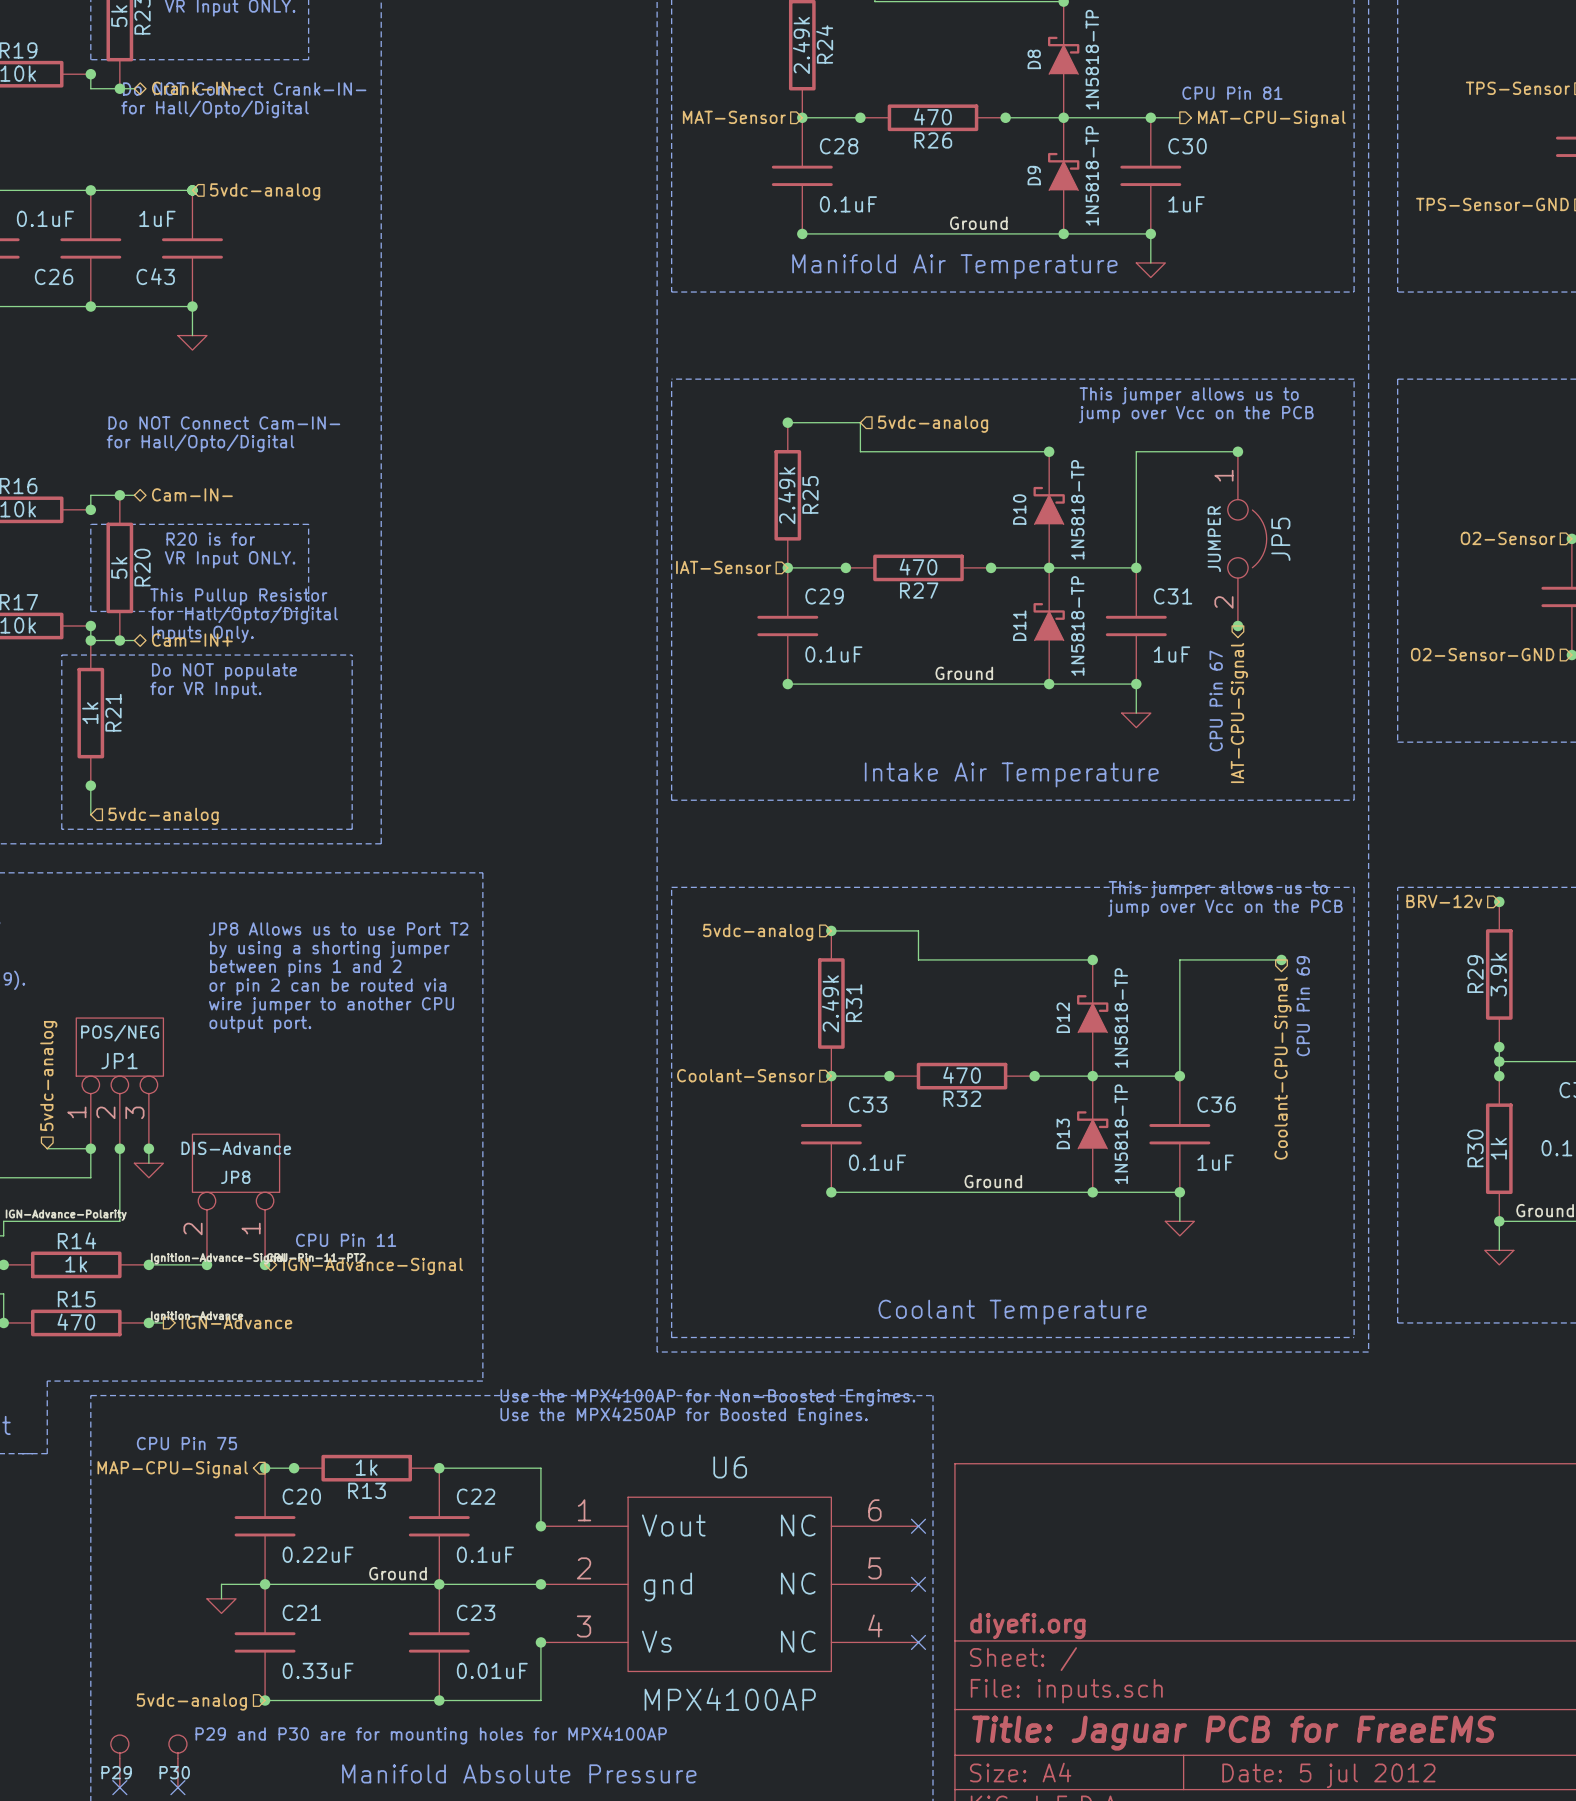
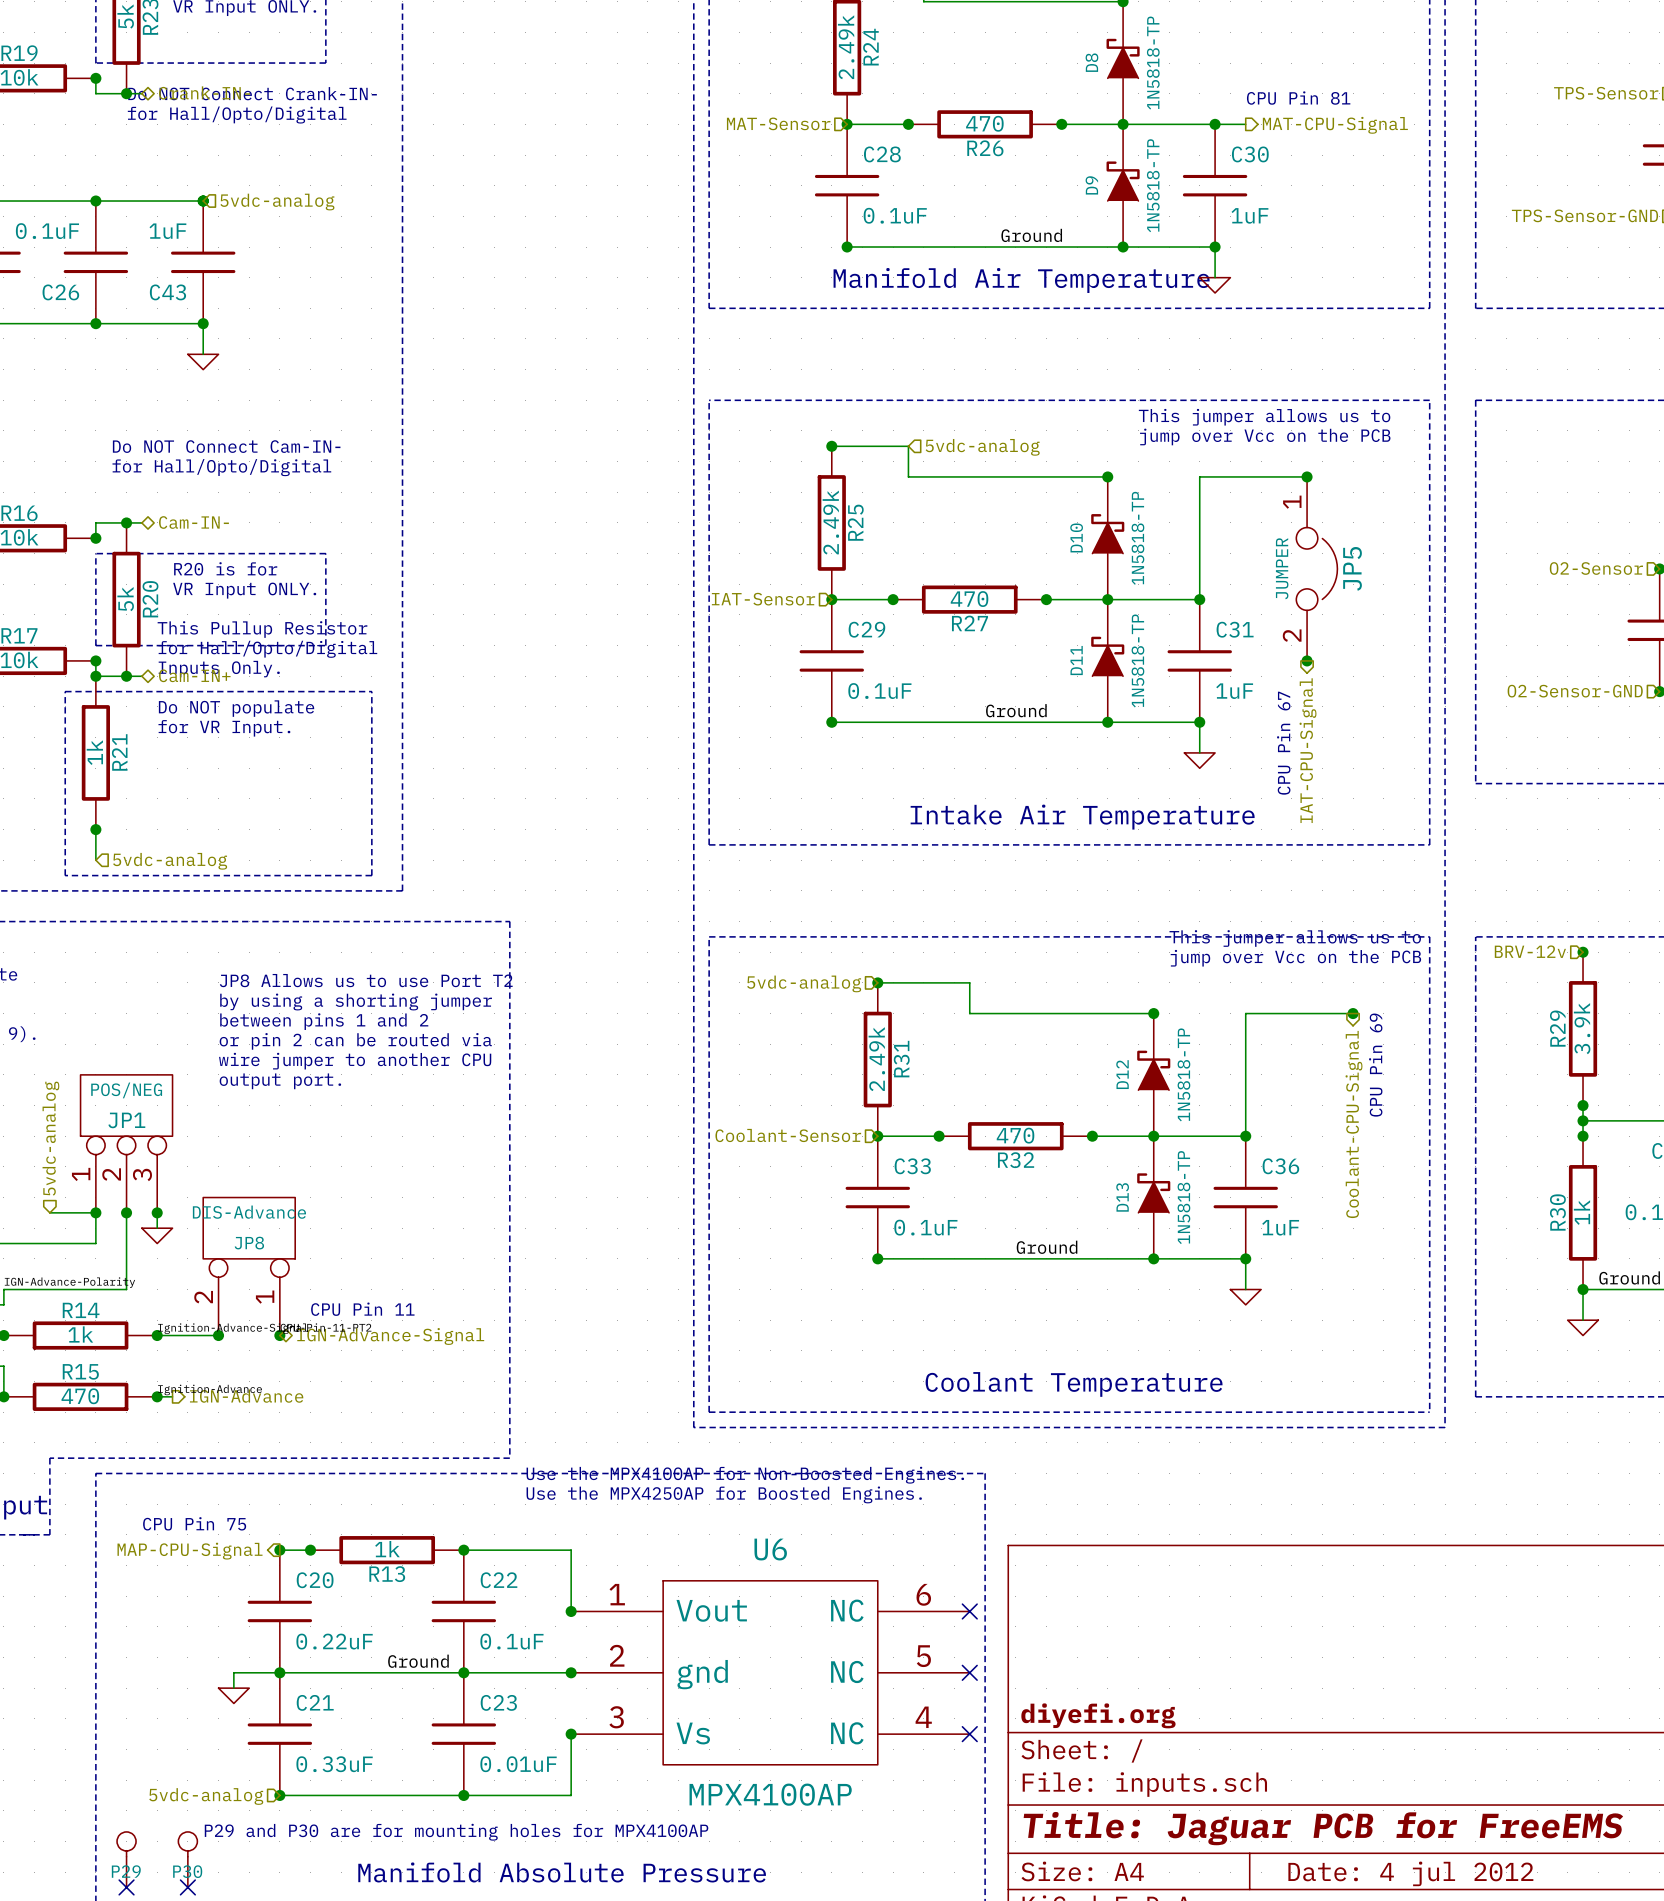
title block: Date: 5 jul 2012 (1328, 1775) -> Date: 4 jul 2012 (1410, 1873)

